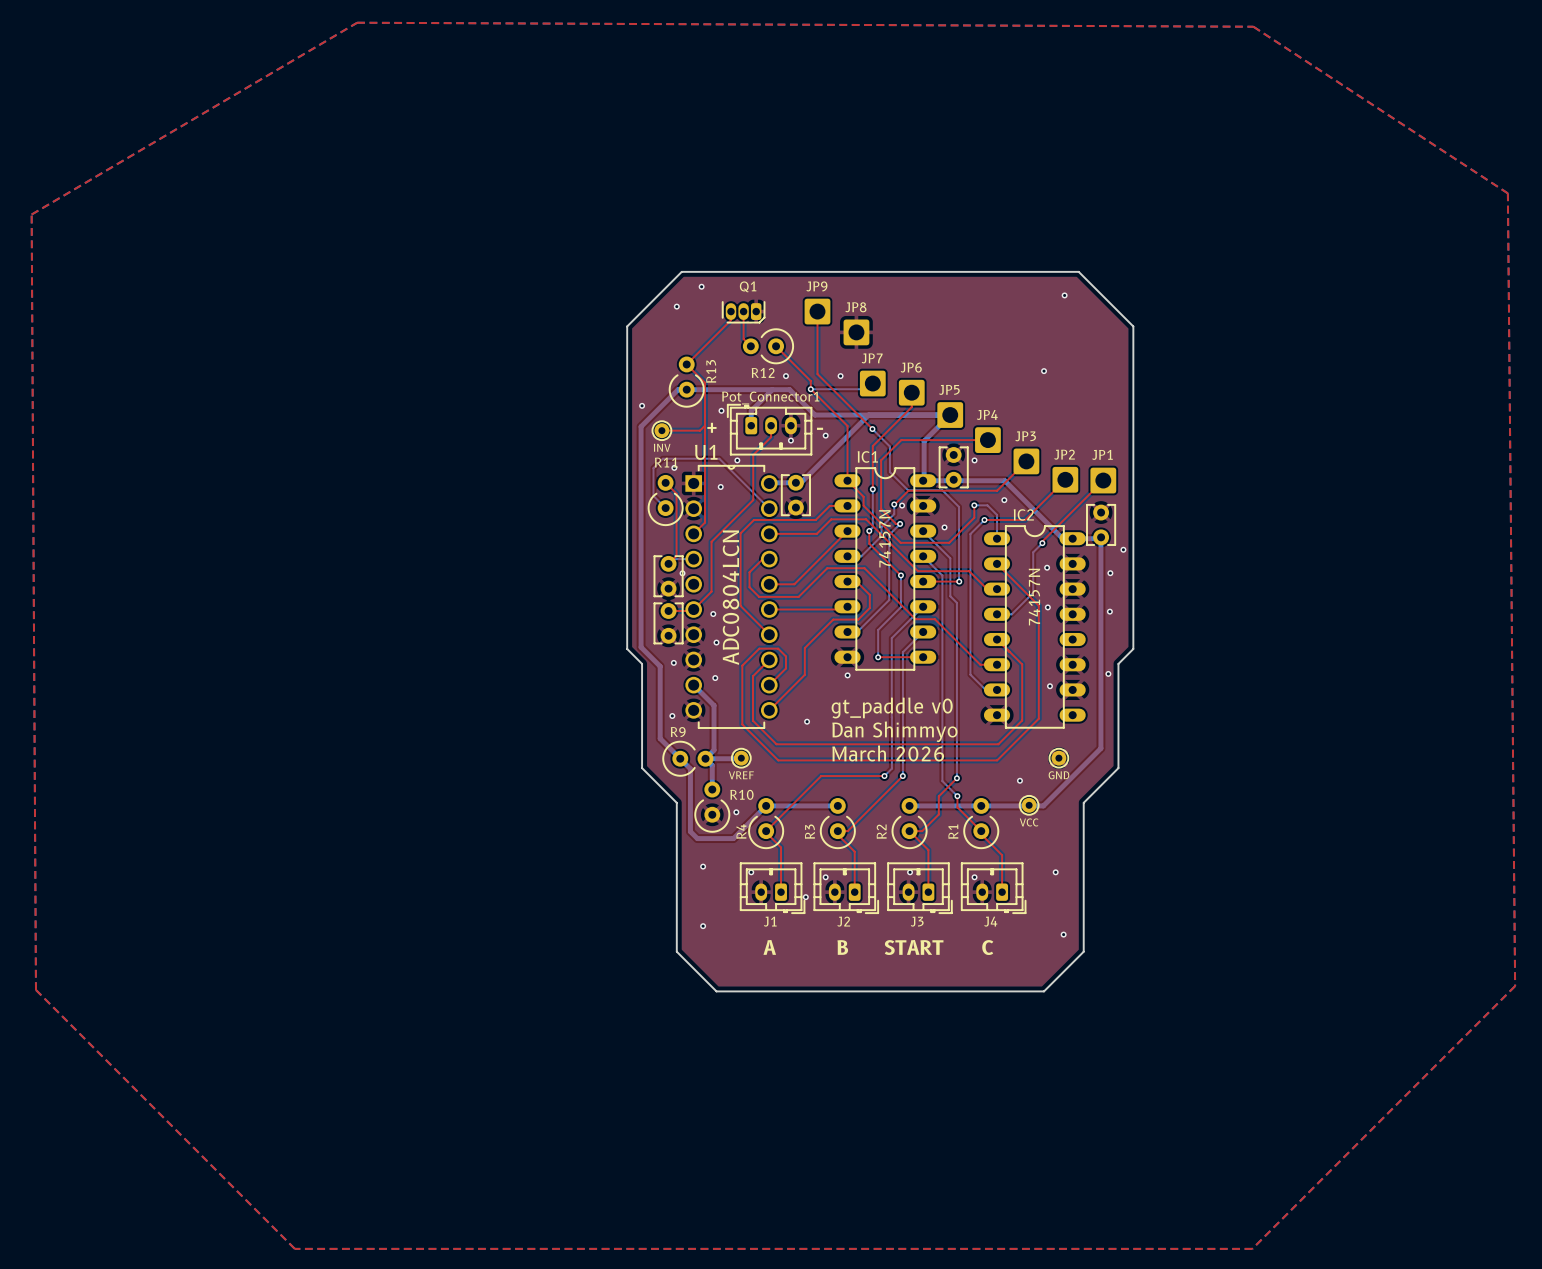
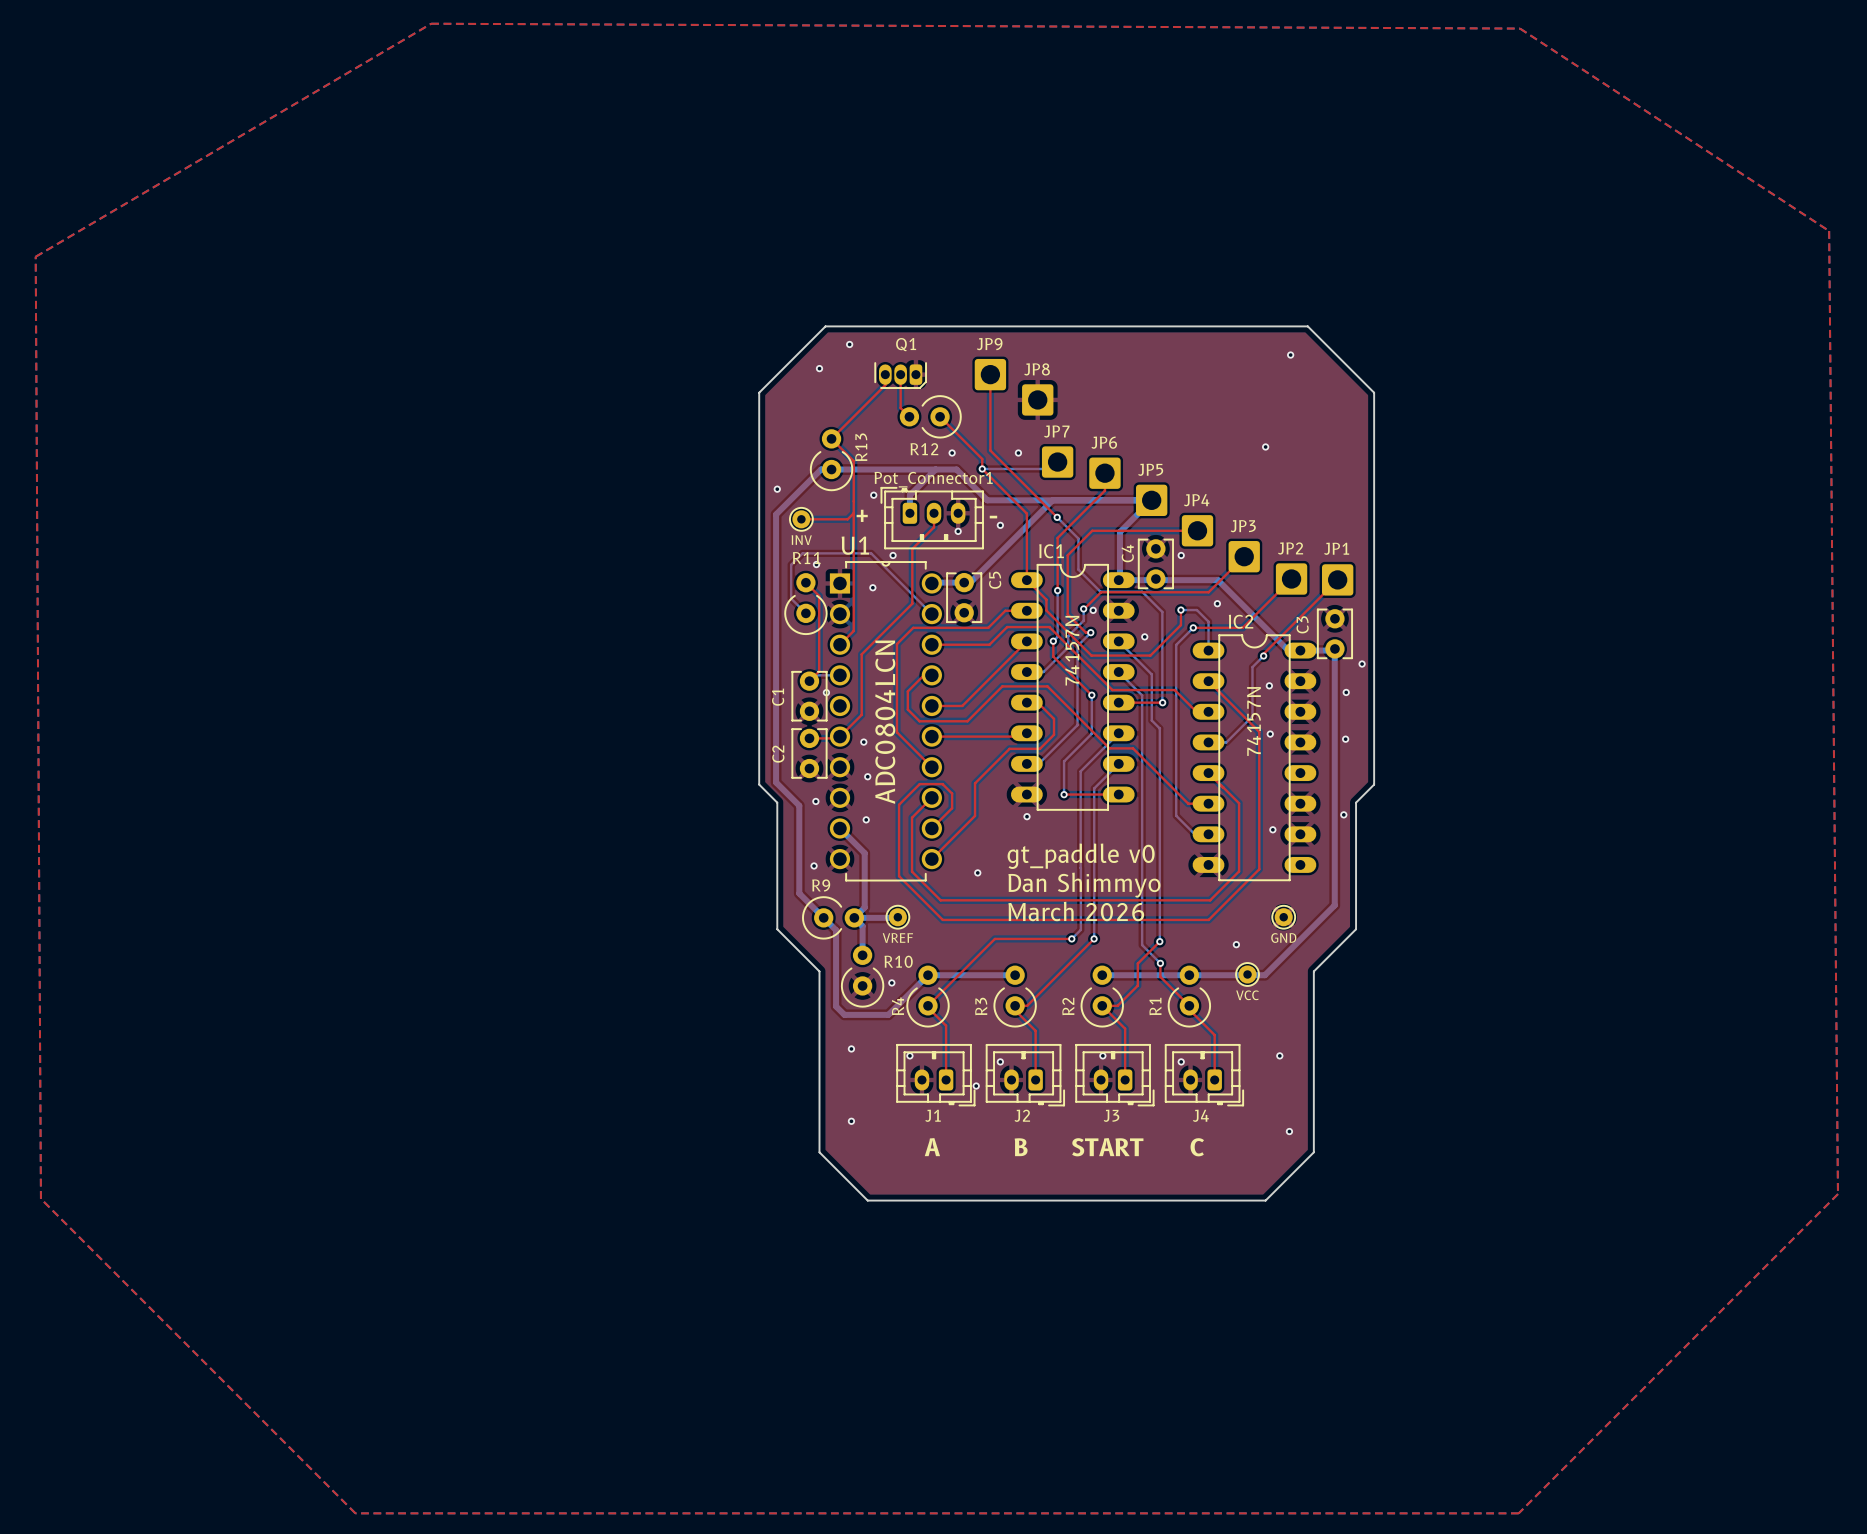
C4 name: none -> C4 (1127, 553)
C5 name: none -> C5 (995, 580)
C3 name: none -> C3 (1302, 624)
C1 name: none -> C1 (778, 697)
C2 name: none -> C2 (778, 754)

